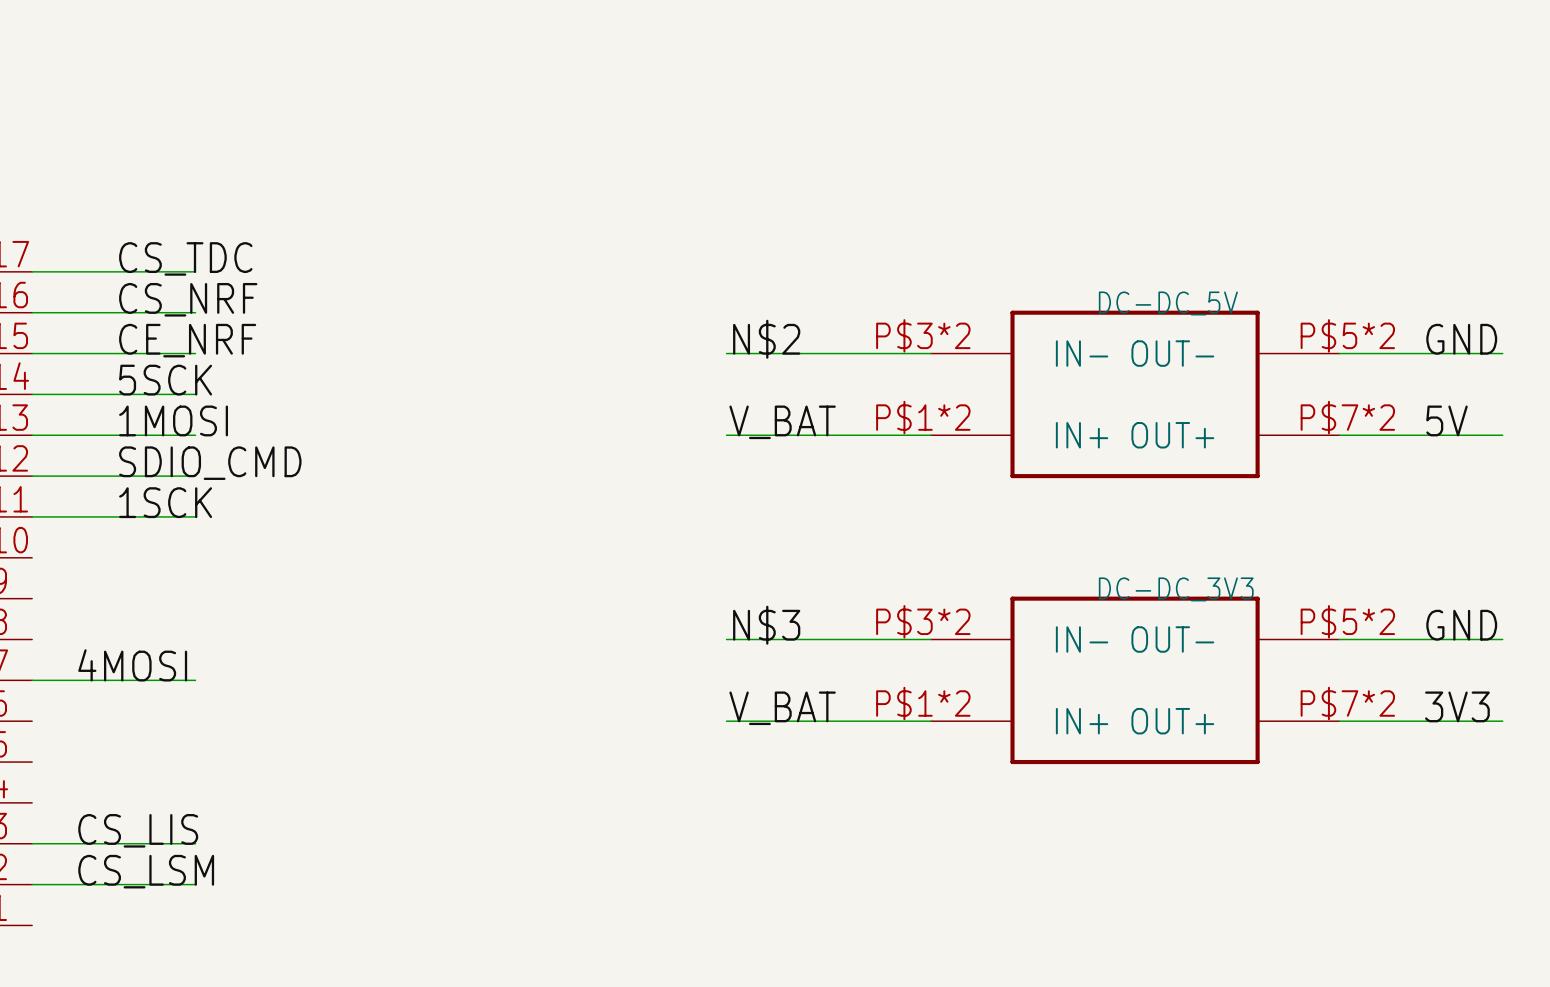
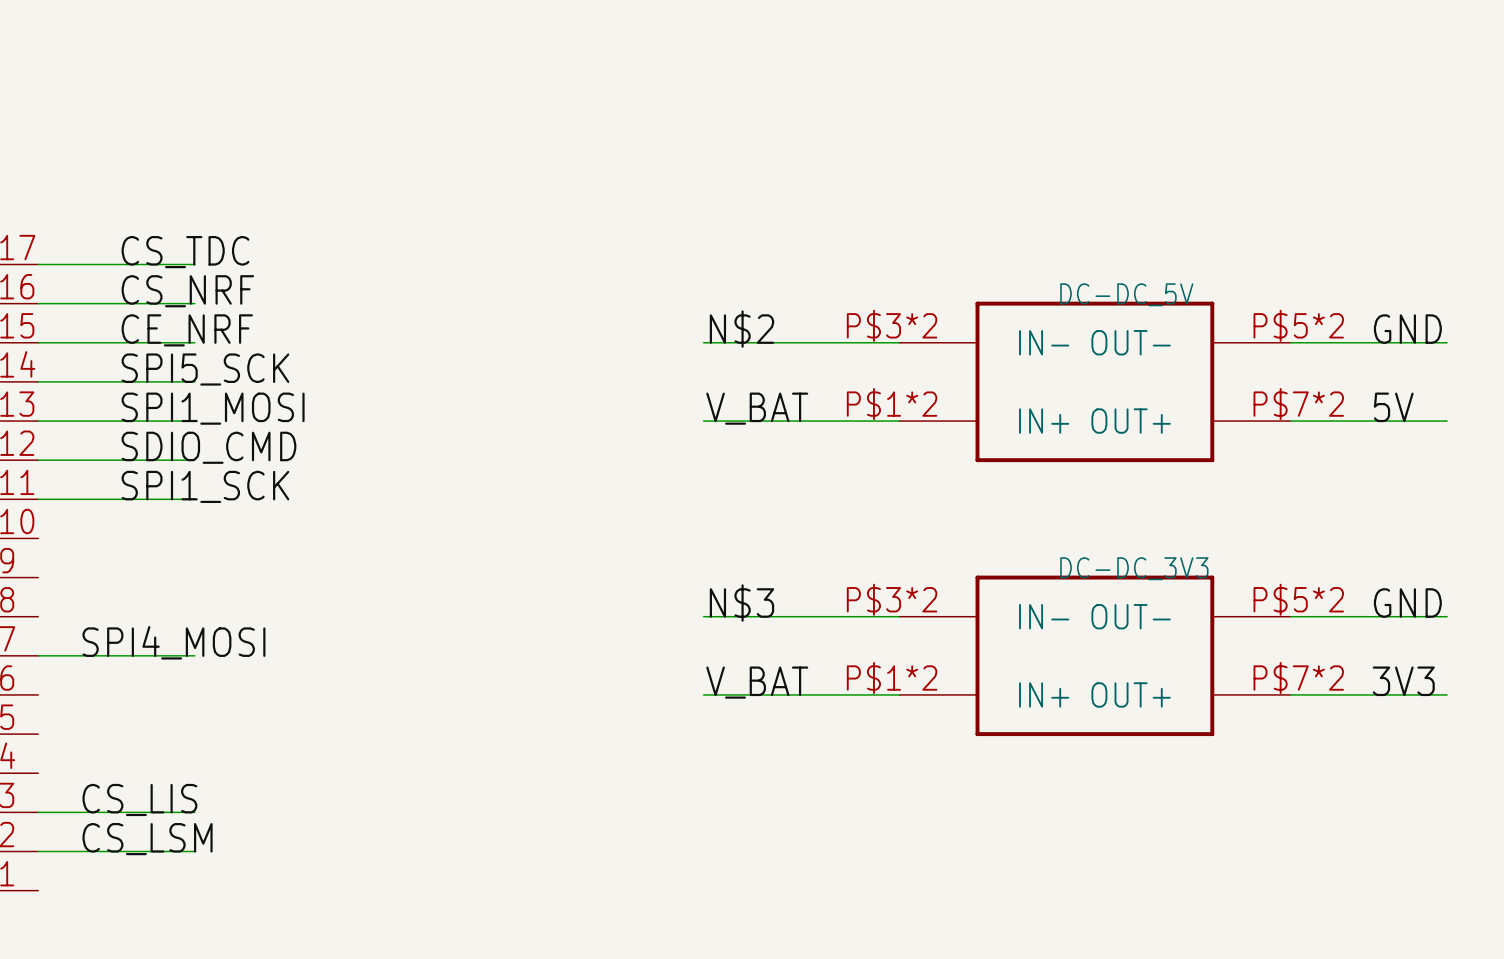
label: 5SCK (165, 380) -> SPI5_SCK (205, 369)
label: 1MOSI (173, 420) -> SPI1_MOSI (213, 408)
label: 1SCK (165, 502) -> SPI1_SCK (205, 486)
label: 4MOSI (132, 665) -> SPI4_MOSI (173, 642)

